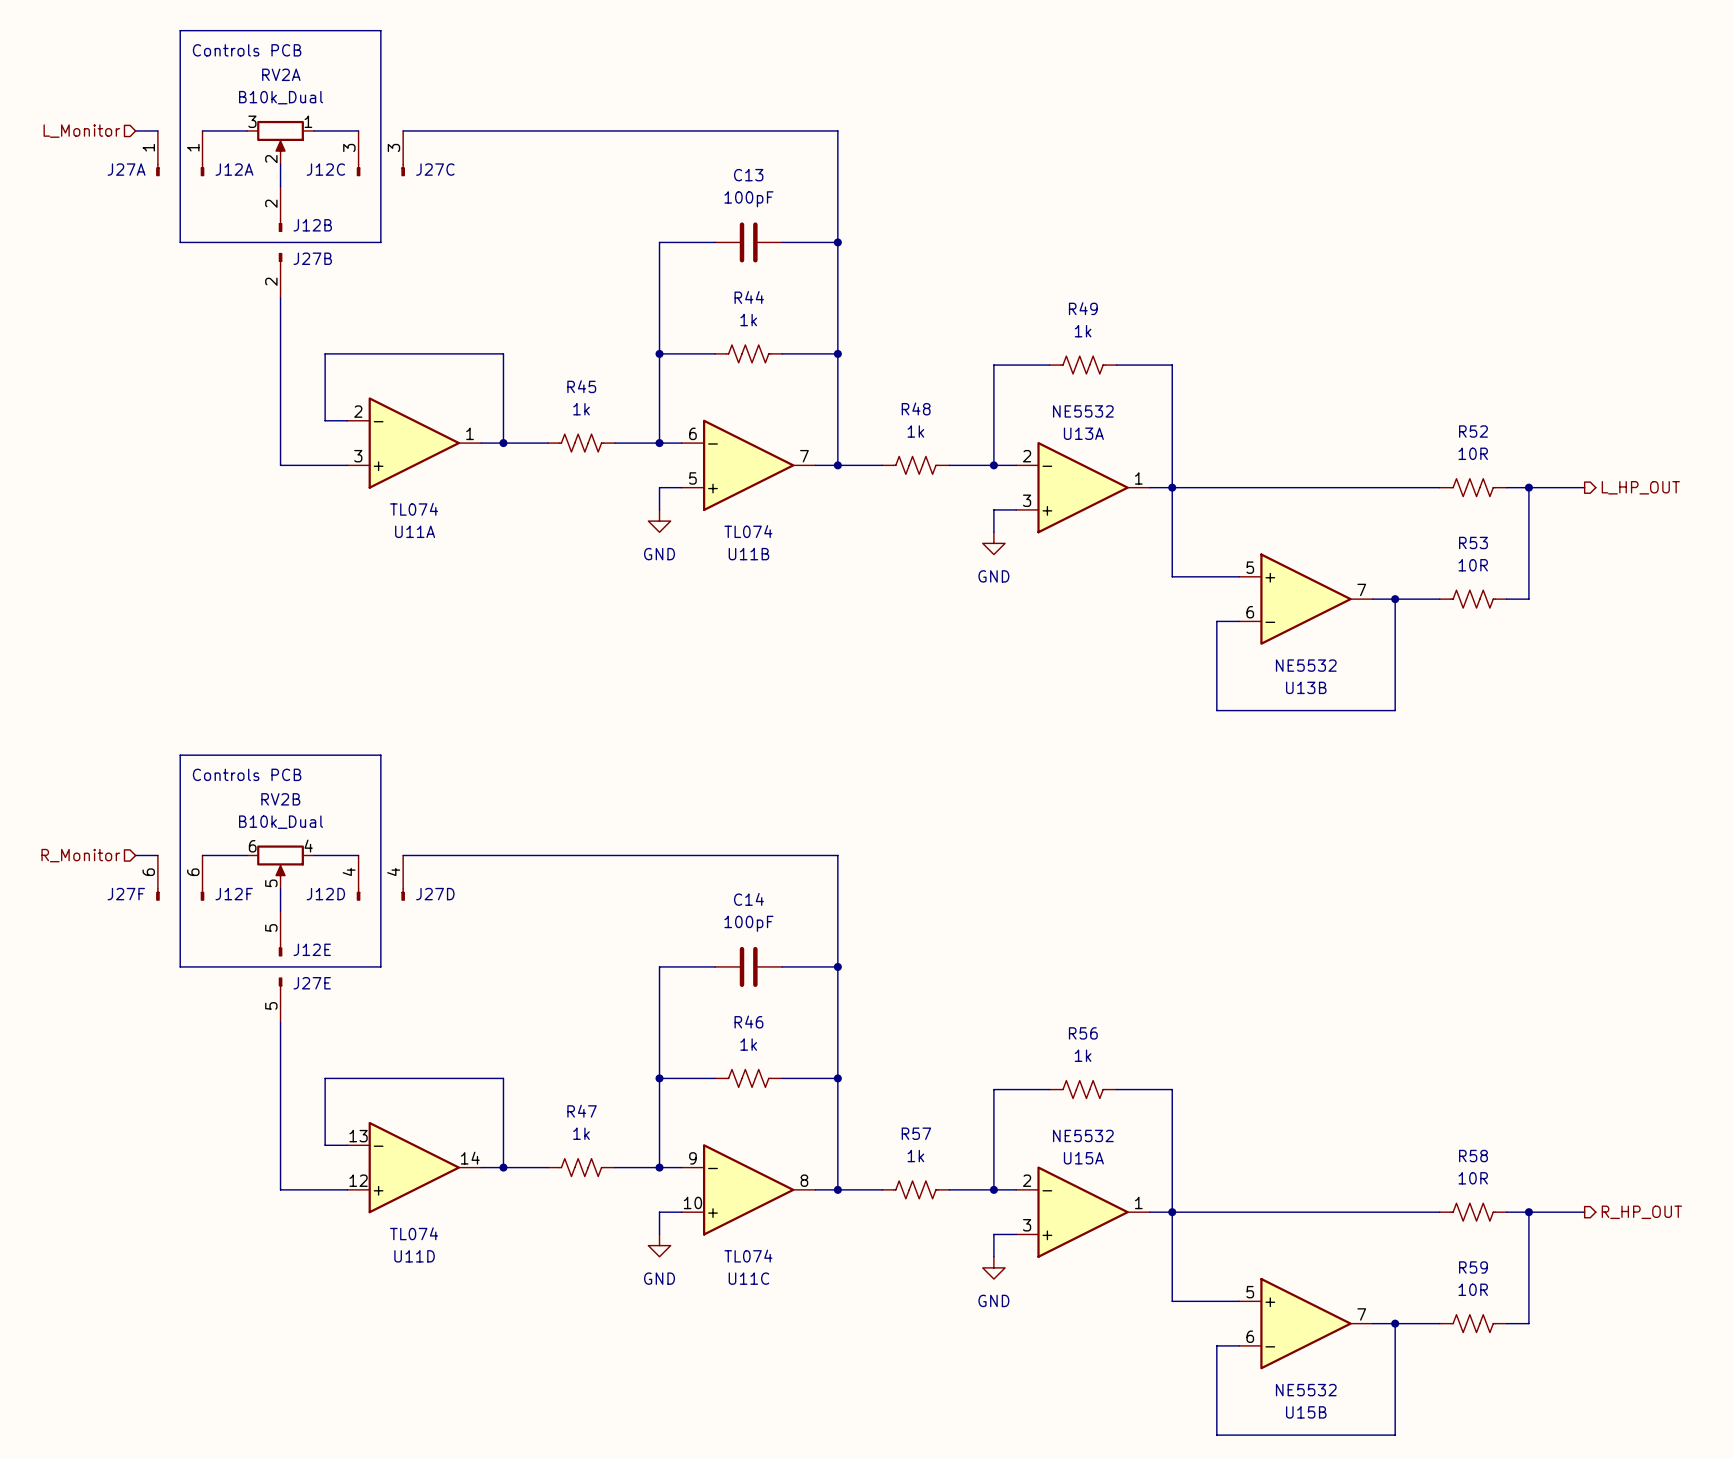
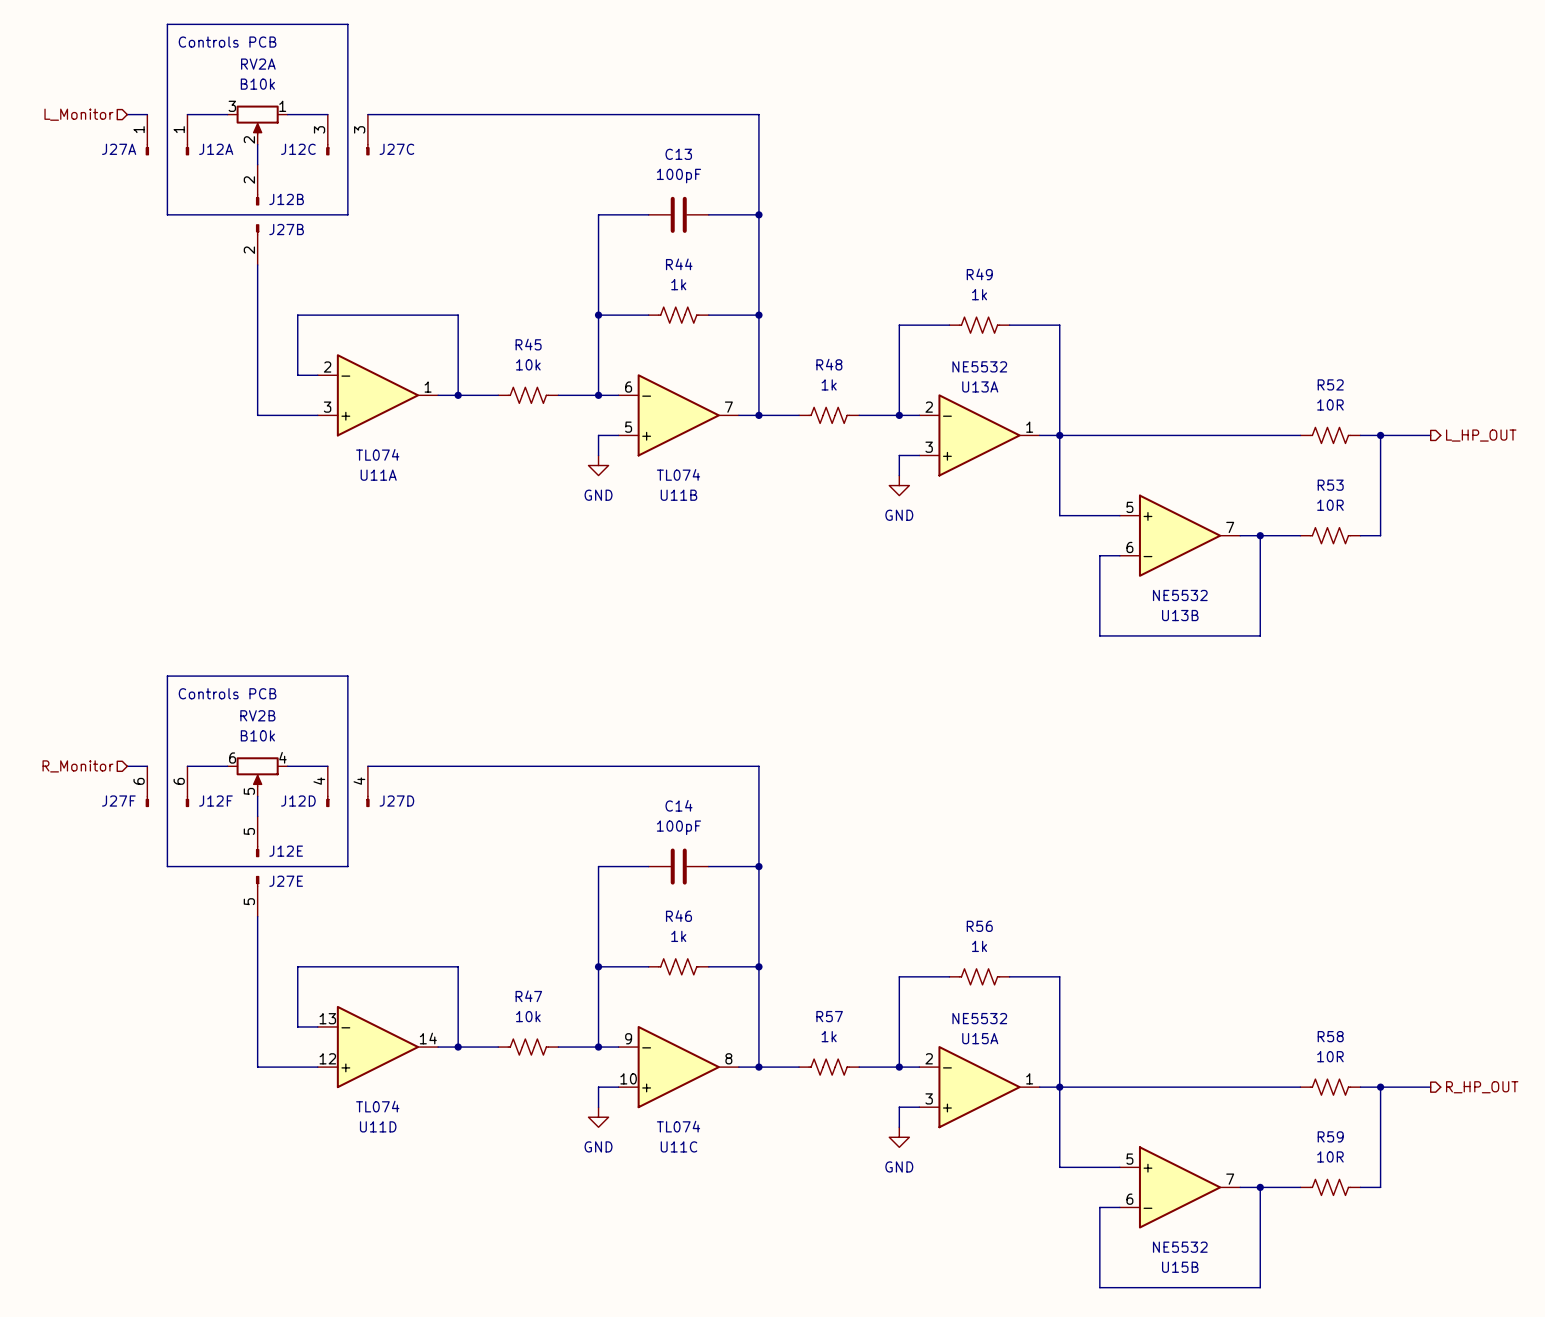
RV2A value: B10k_Dual (281, 97) -> B10k (257, 84)
R45 value: 1k (581, 409) -> 10k (528, 364)
RV2B value: B10k_Dual (281, 822) -> B10k (257, 735)
R47 value: 1k (581, 1133) -> 10k (528, 1016)

